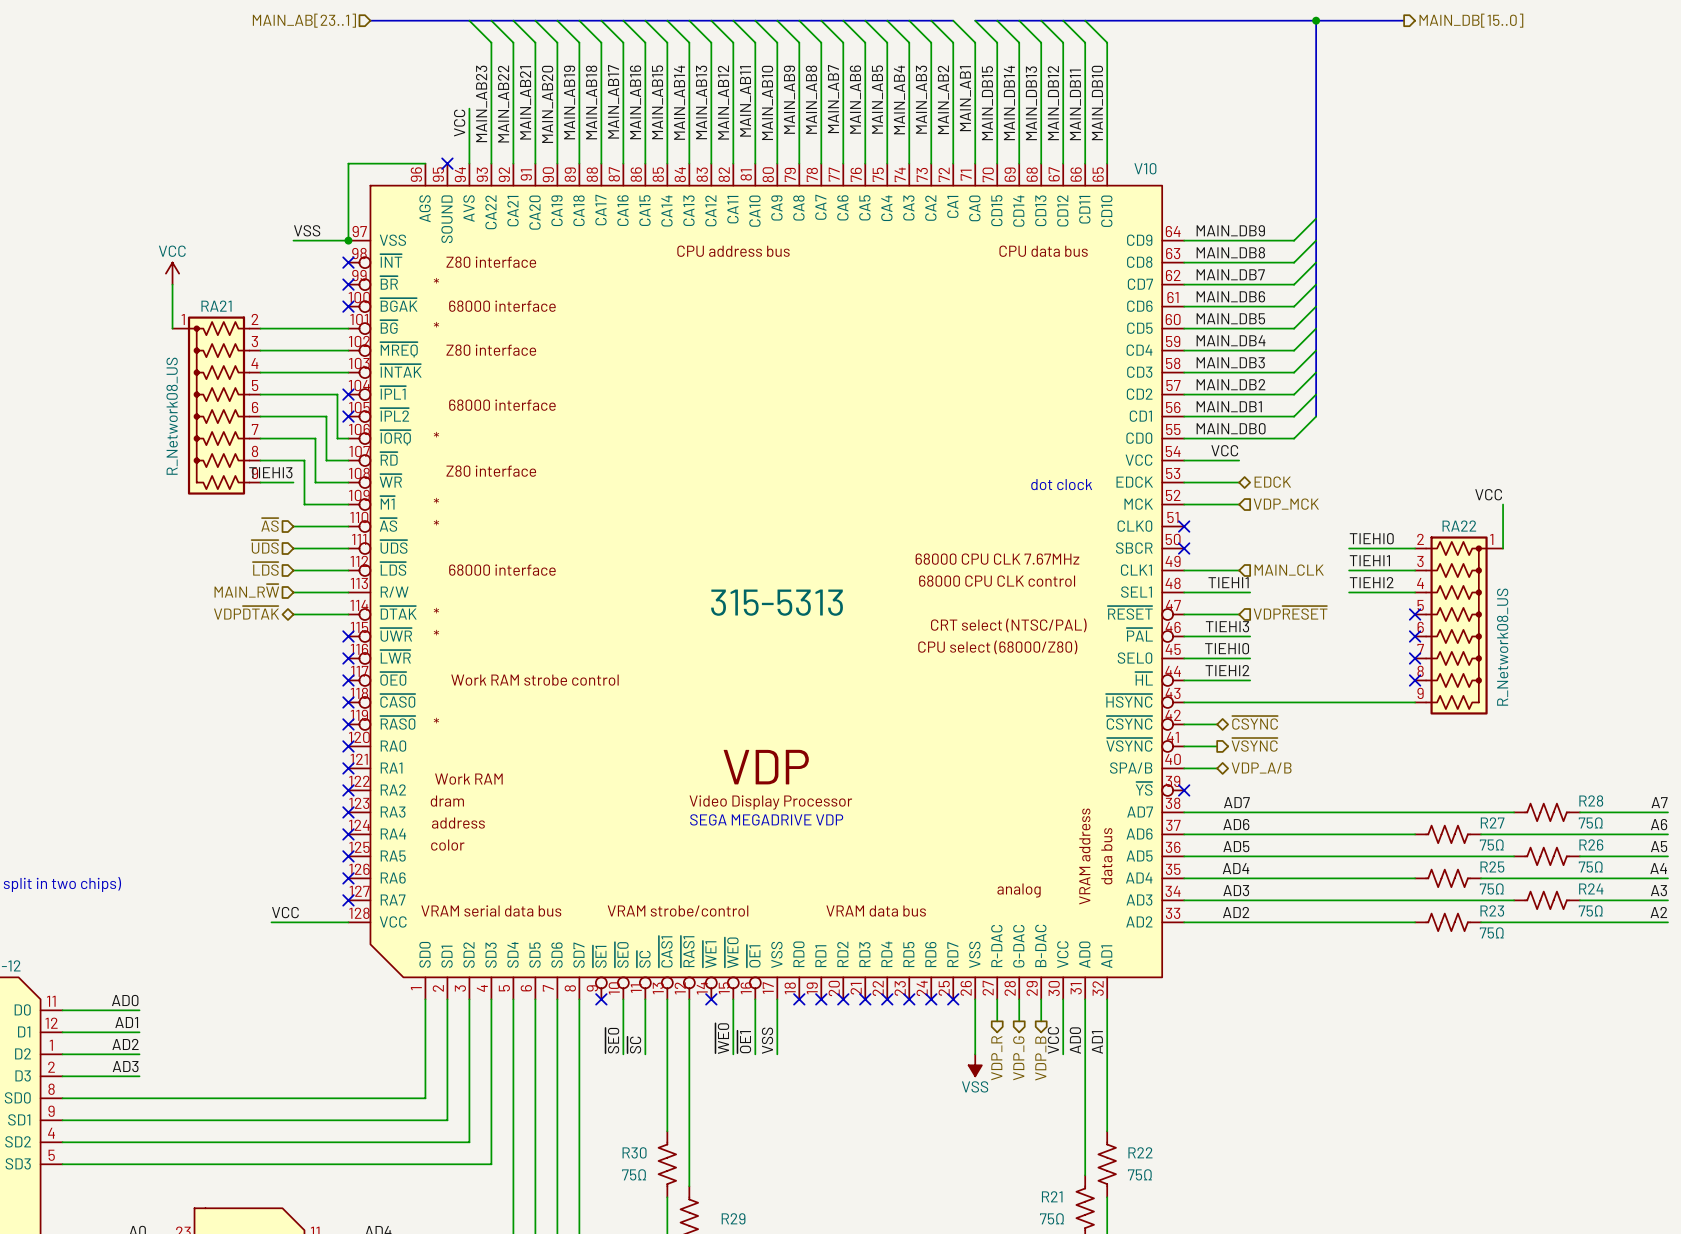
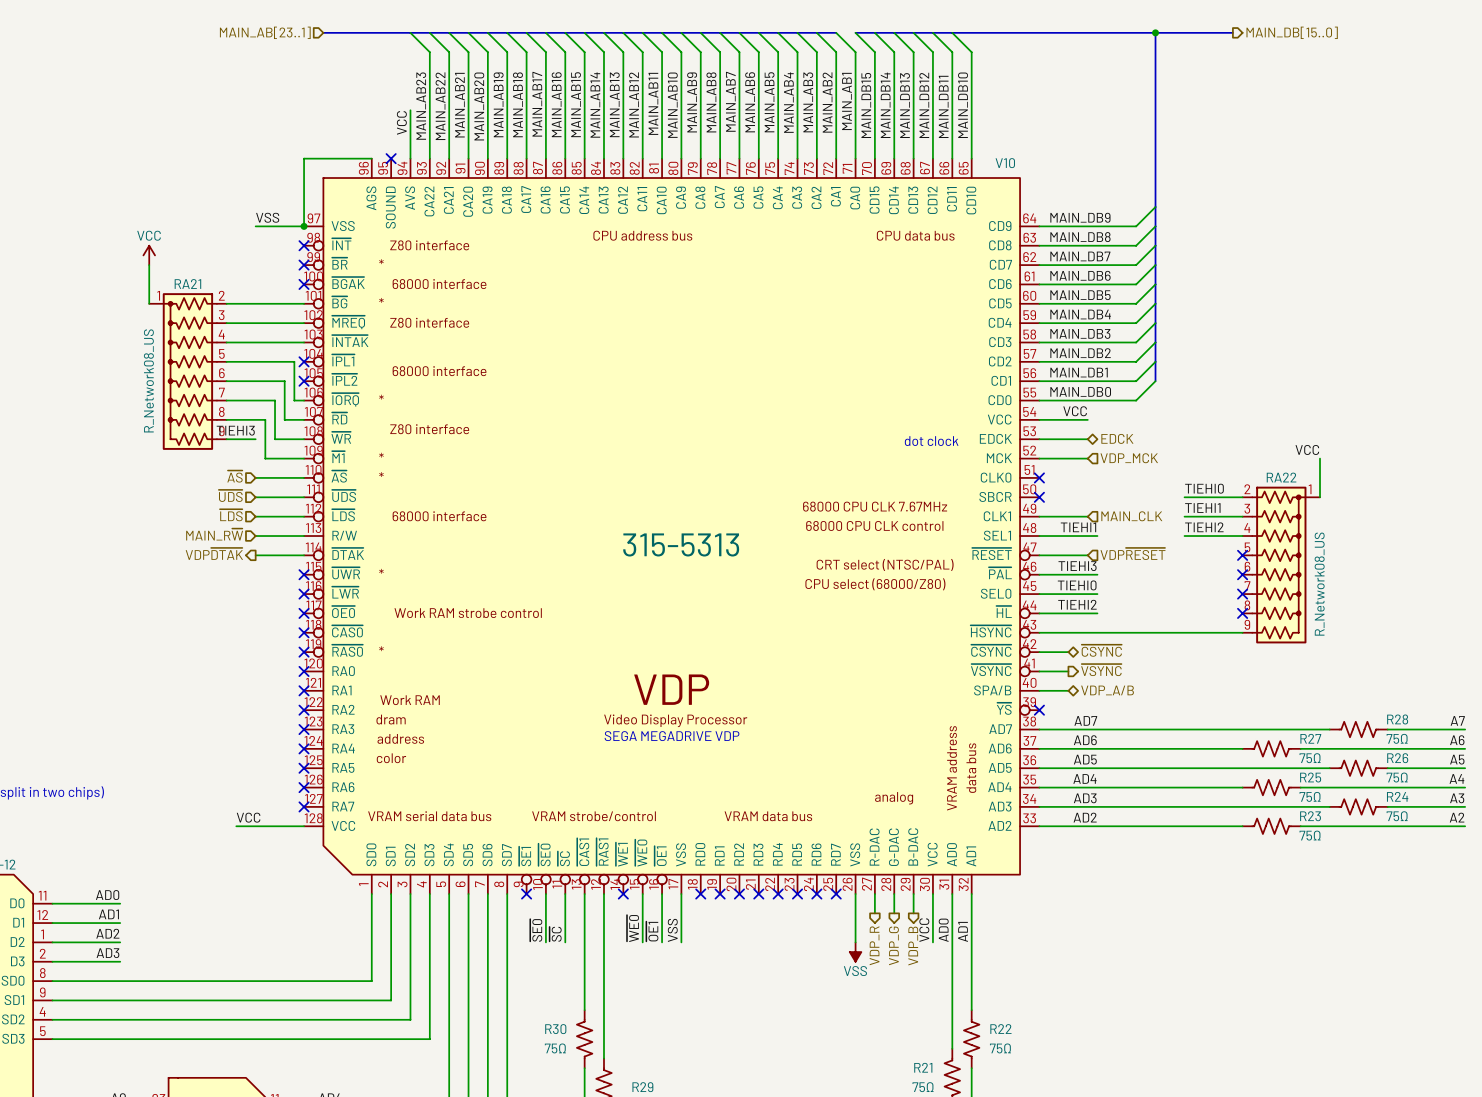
V10 text: * (436, 610) -> none
hierarchical label shape: bidirectional (246, 612) -> output (214, 553)

